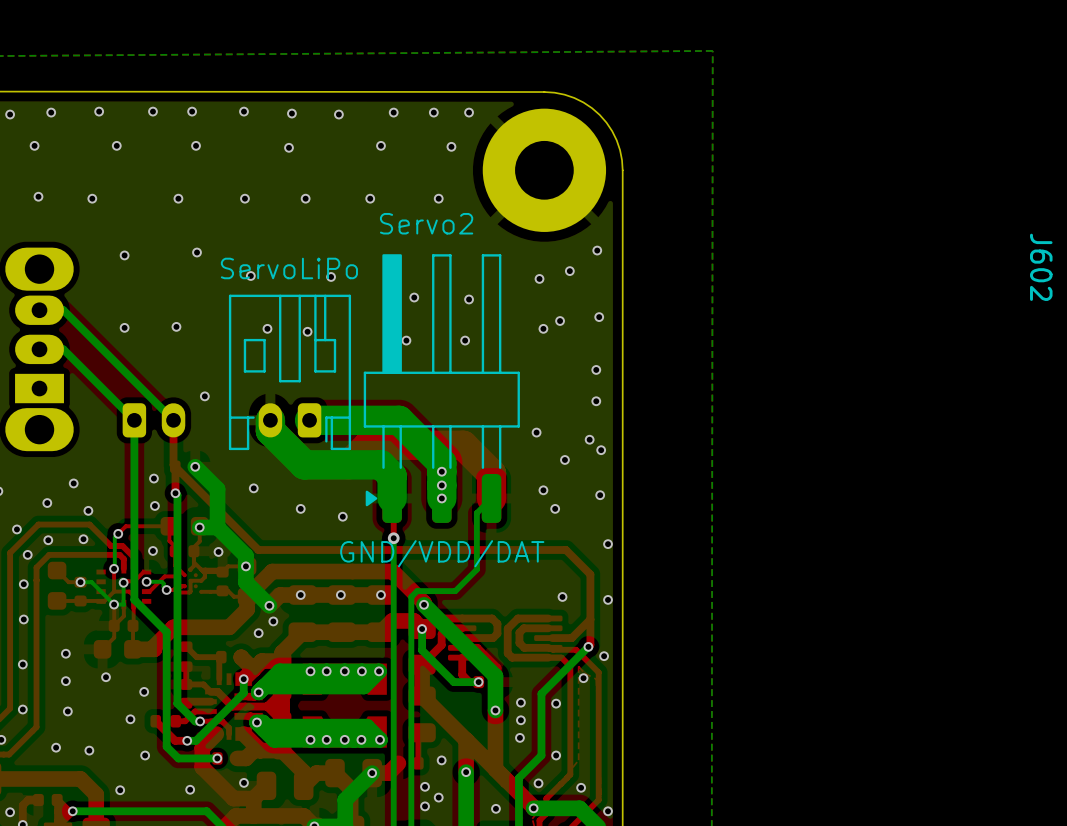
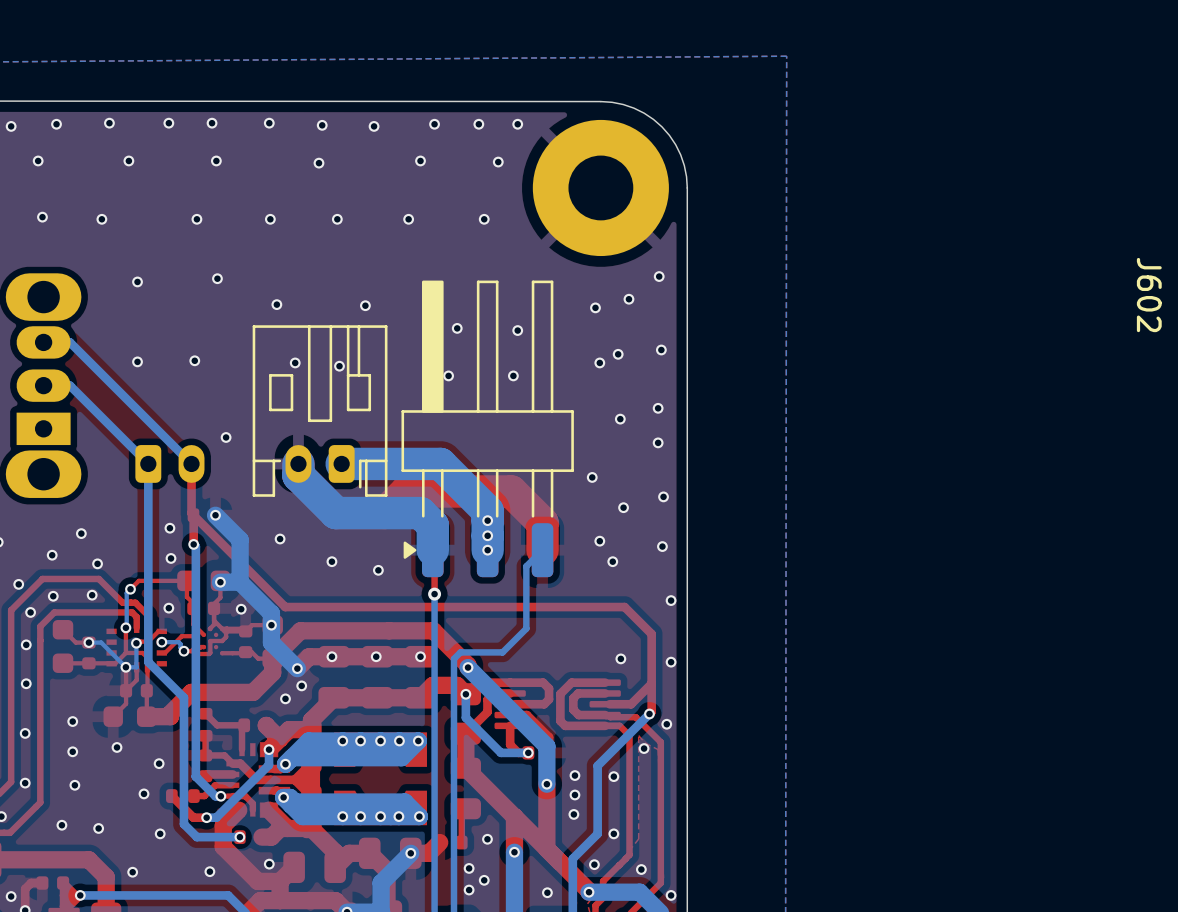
text: Servo2 (426, 223) -> none
text: ServoLiPo (289, 268) -> none
via position: (589, 439) -> (620, 419)
text: GND/VDD/DAT (442, 553) -> none

